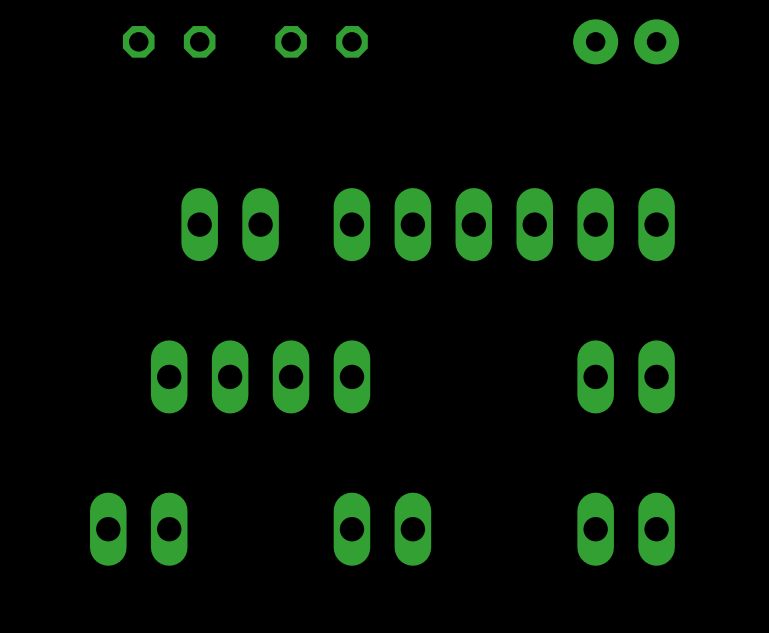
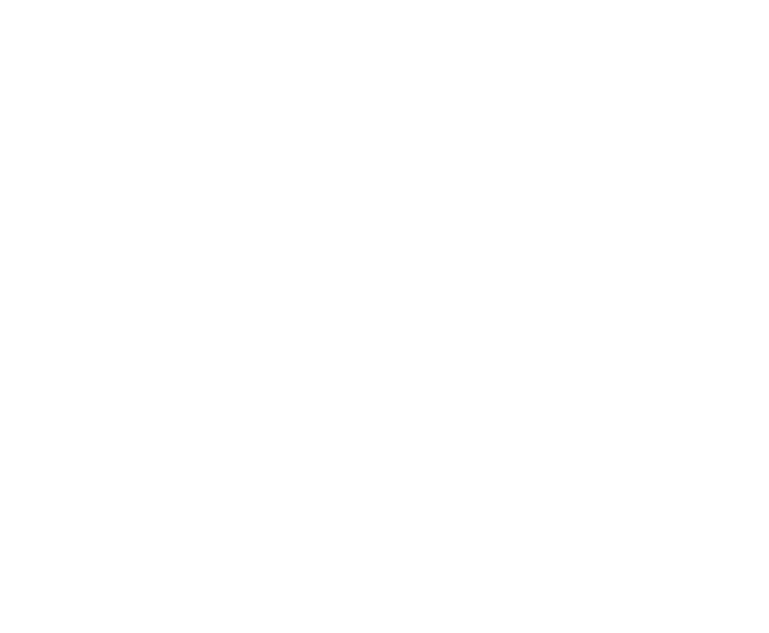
part: (169, 41) -> none
part: (321, 41) -> none
part: (626, 41) -> none
part: (230, 224) -> none
part: (504, 224) -> none
part: (260, 376) -> none
part: (626, 376) -> none
part: (138, 529) -> none
part: (382, 529) -> none
part: (626, 529) -> none

